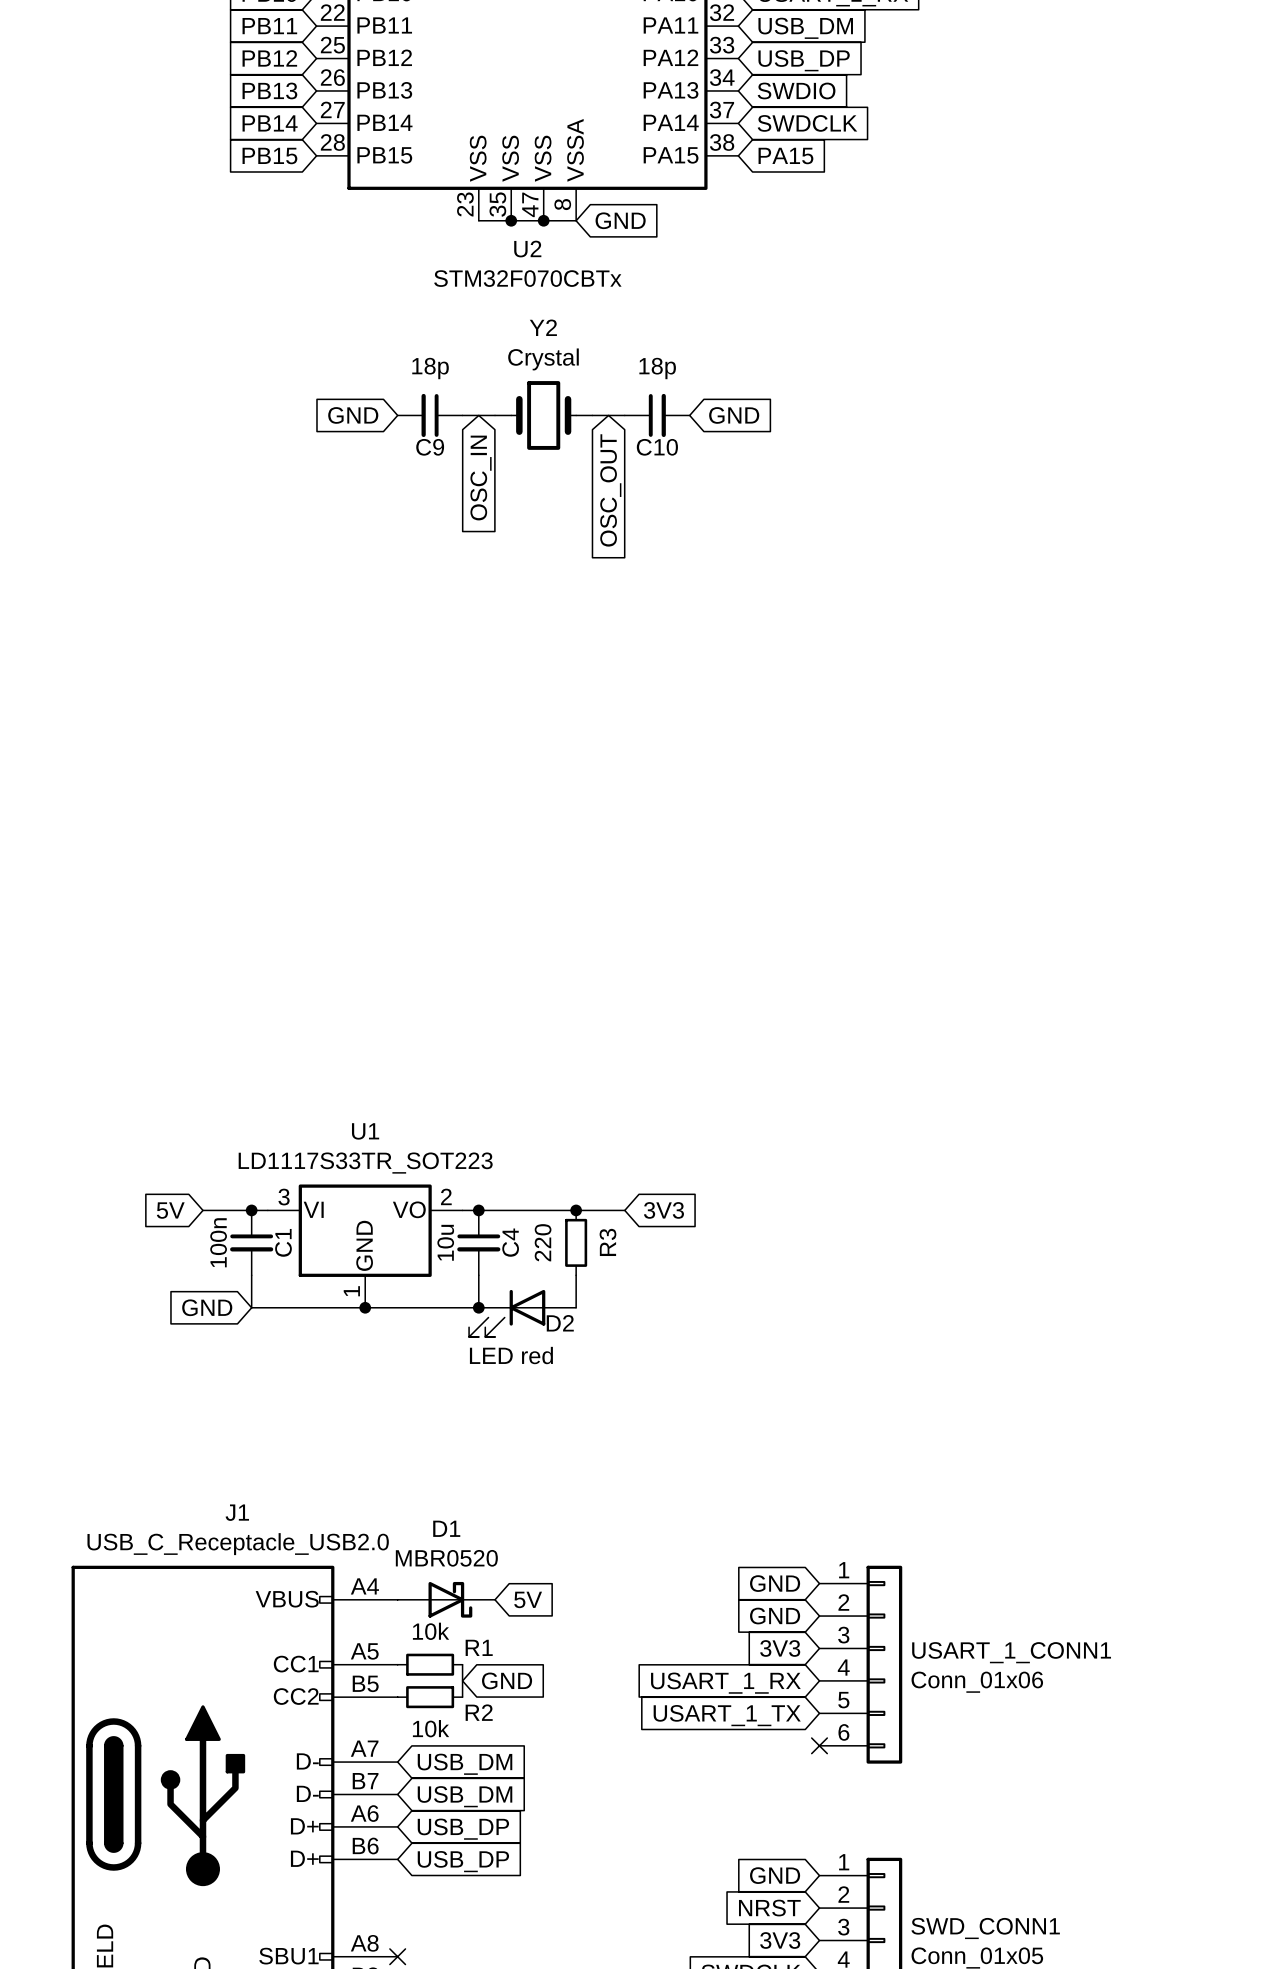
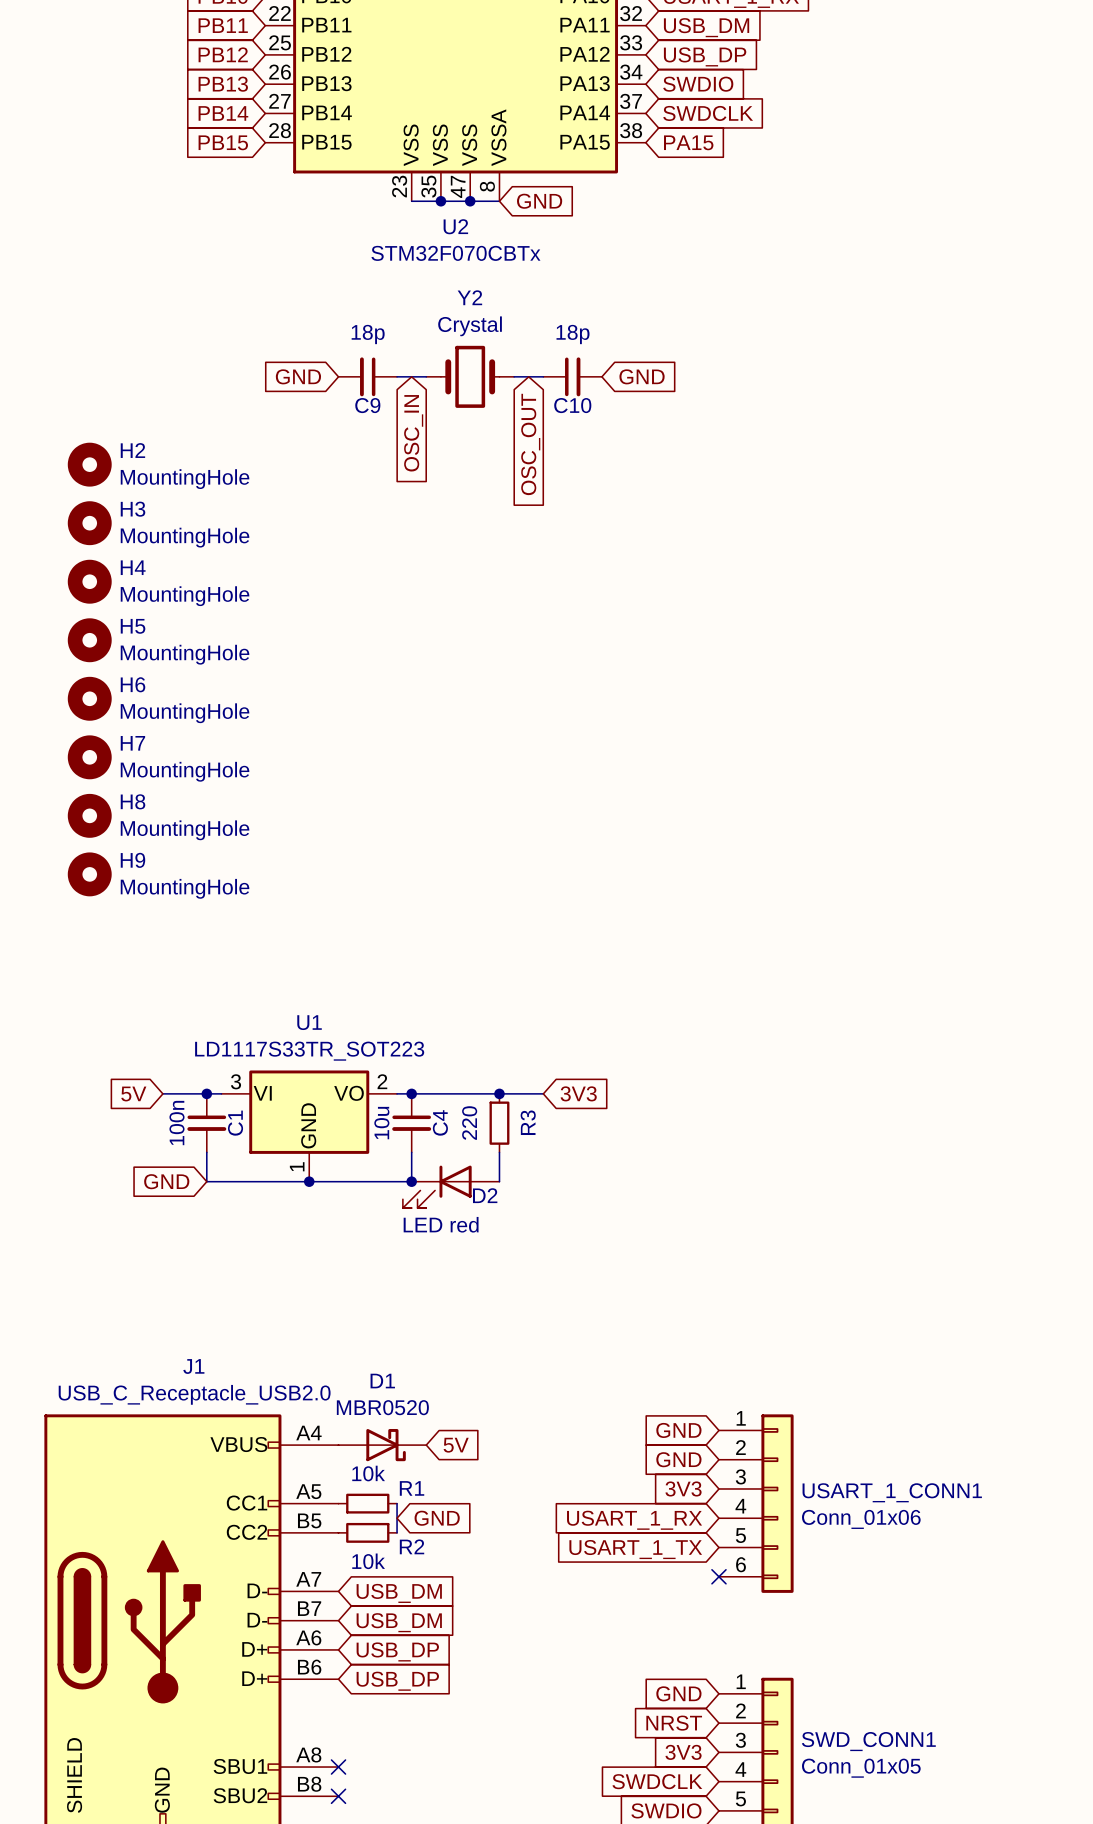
H2: none -> MountingHole (89, 464)
H3: none -> MountingHole (89, 523)
H4: none -> MountingHole (89, 581)
H5: none -> MountingHole (89, 640)
H6: none -> MountingHole (89, 698)
H7: none -> MountingHole (89, 757)
H8: none -> MountingHole (89, 815)
H9: none -> MountingHole (89, 874)

